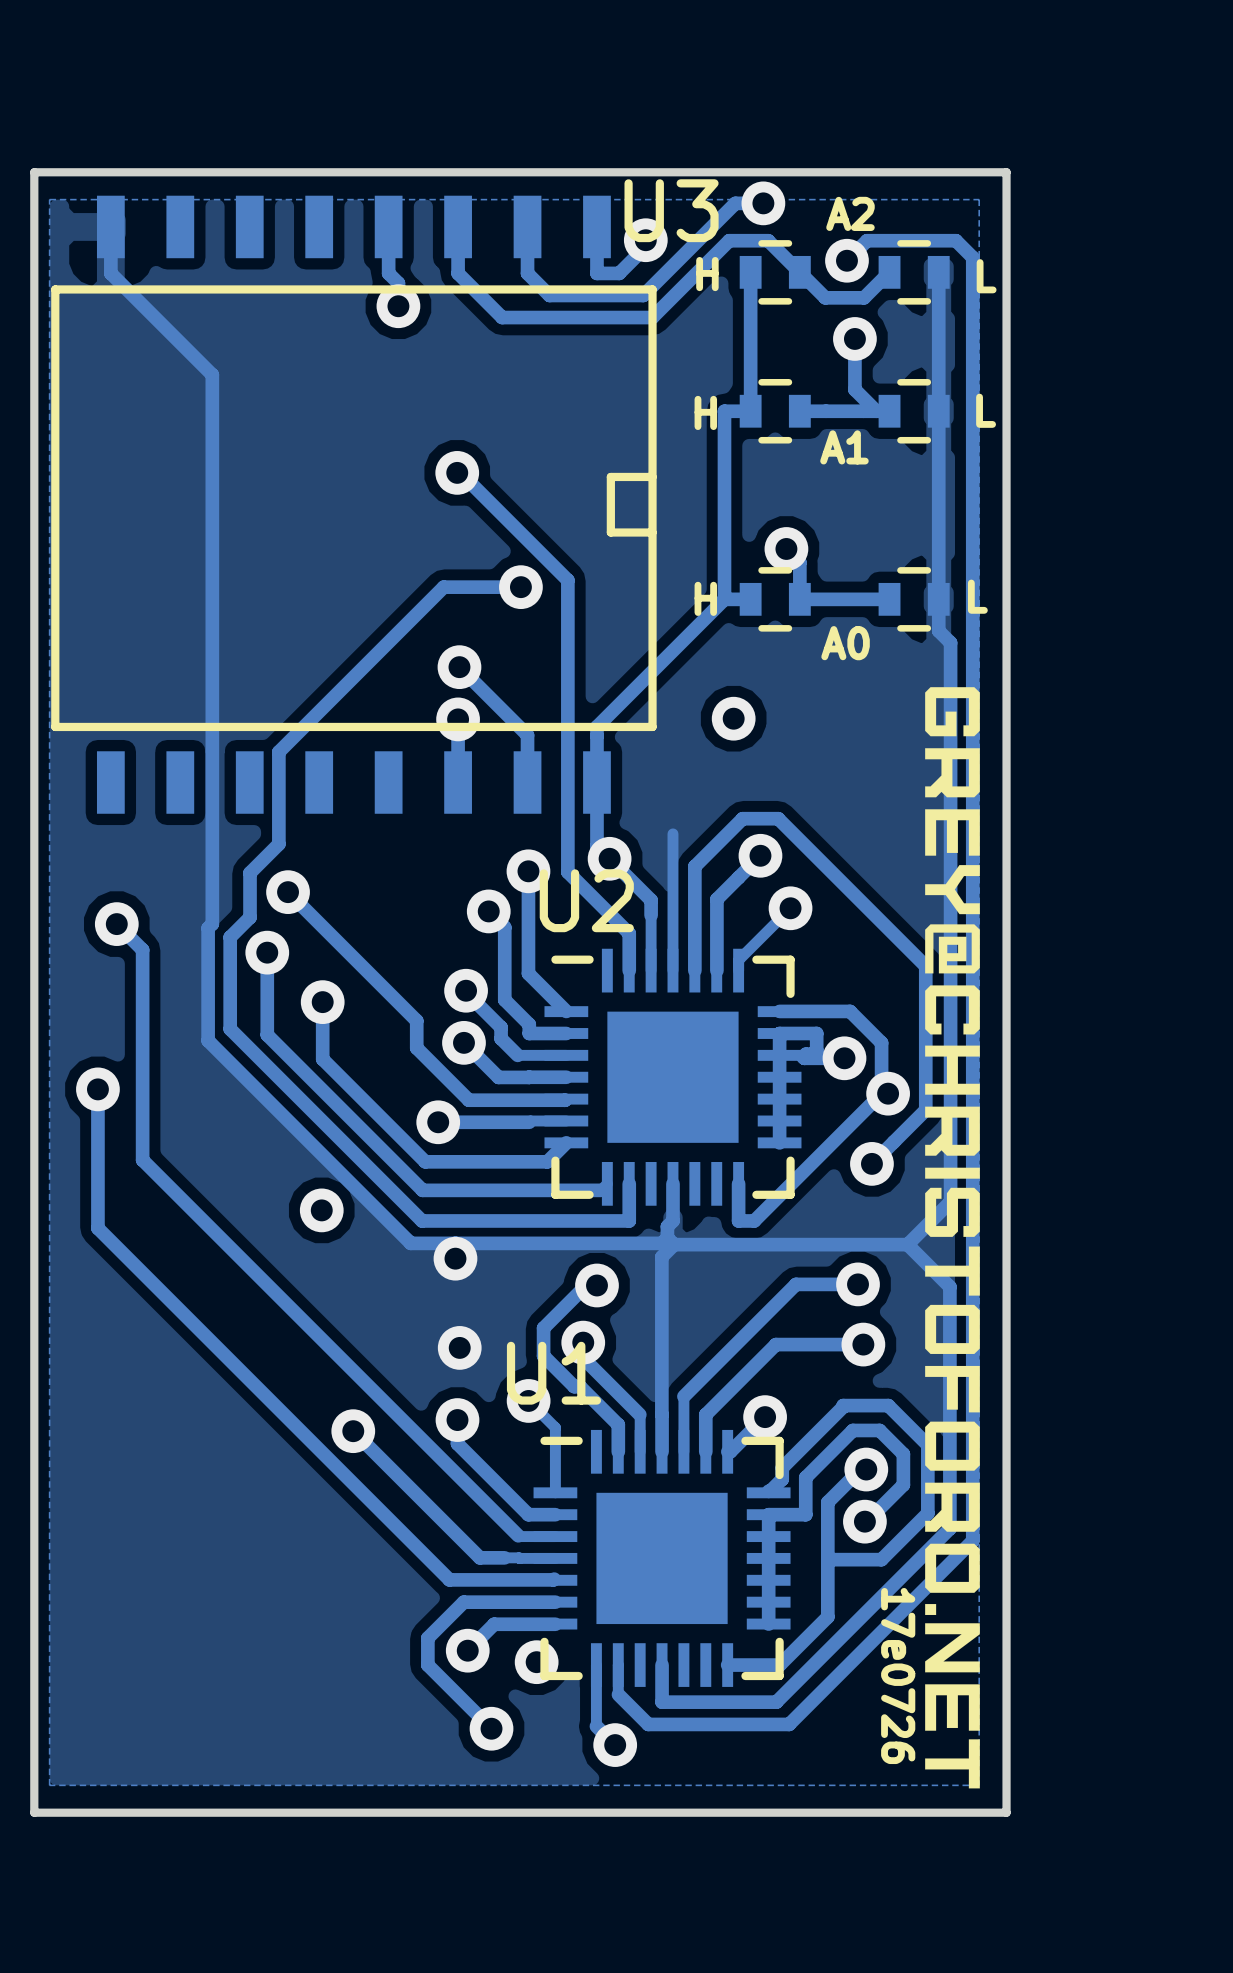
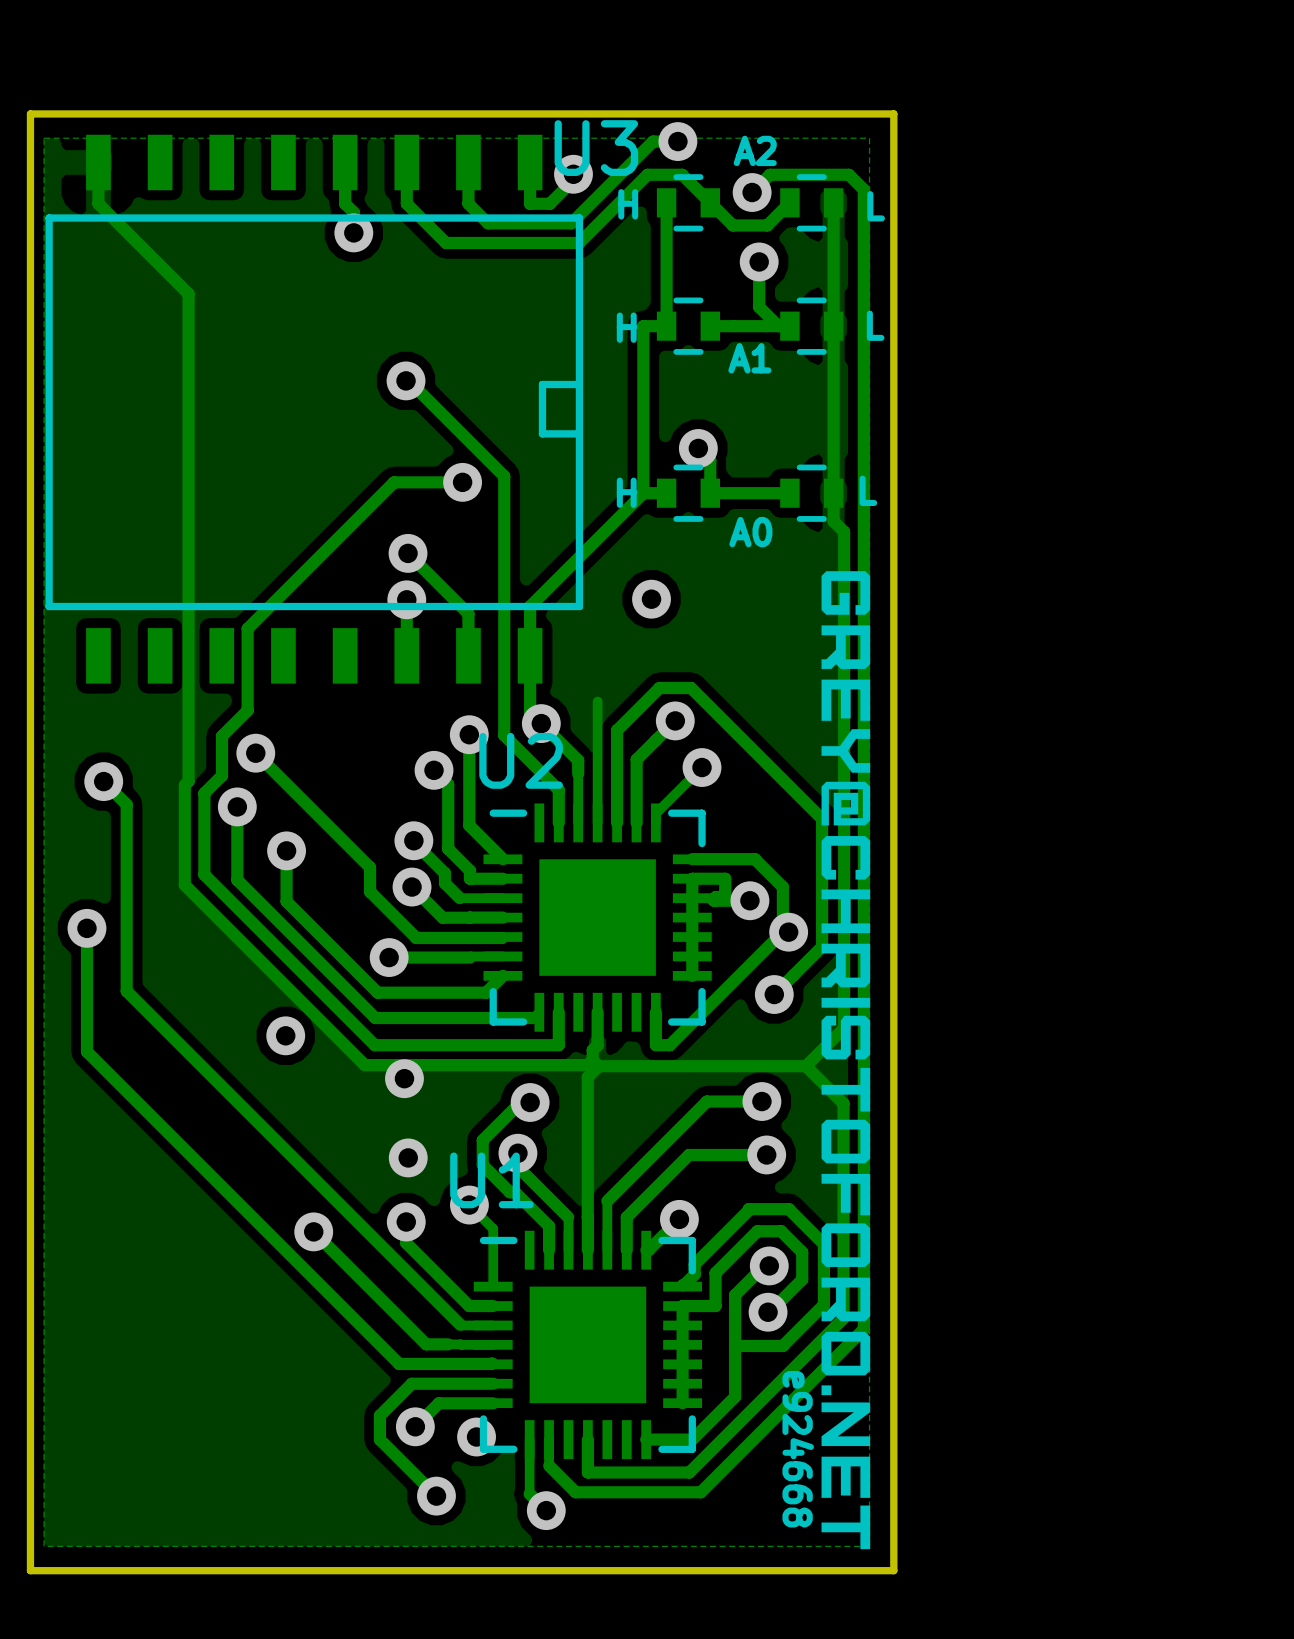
text: 17e0726 (898, 1676) -> e924668 (798, 1449)

